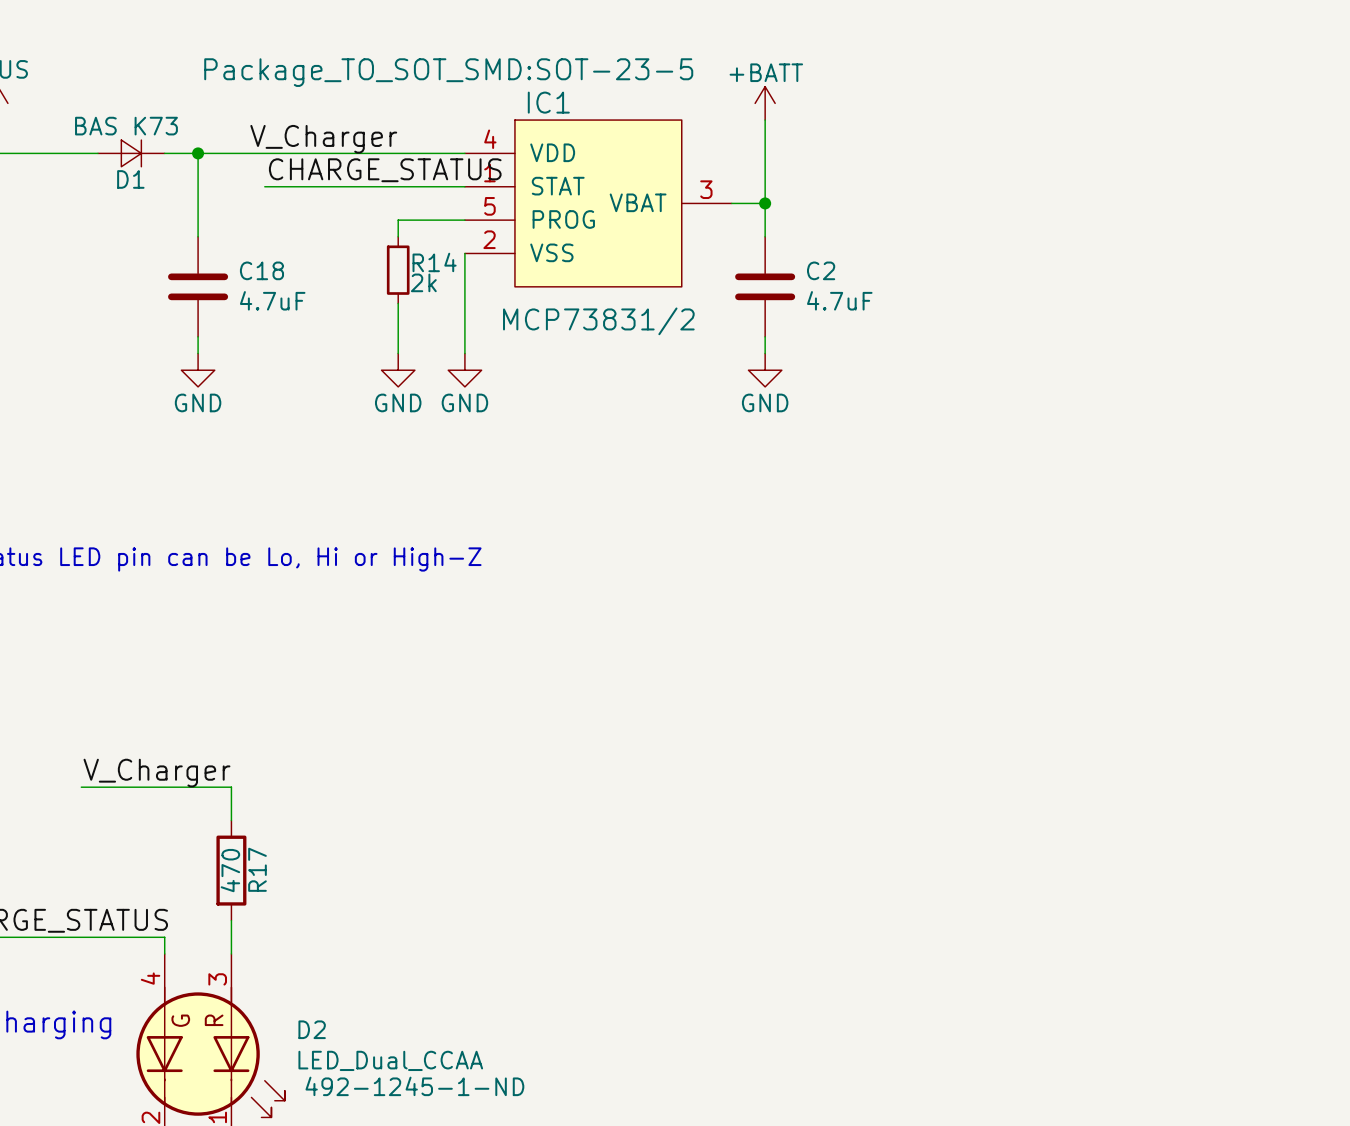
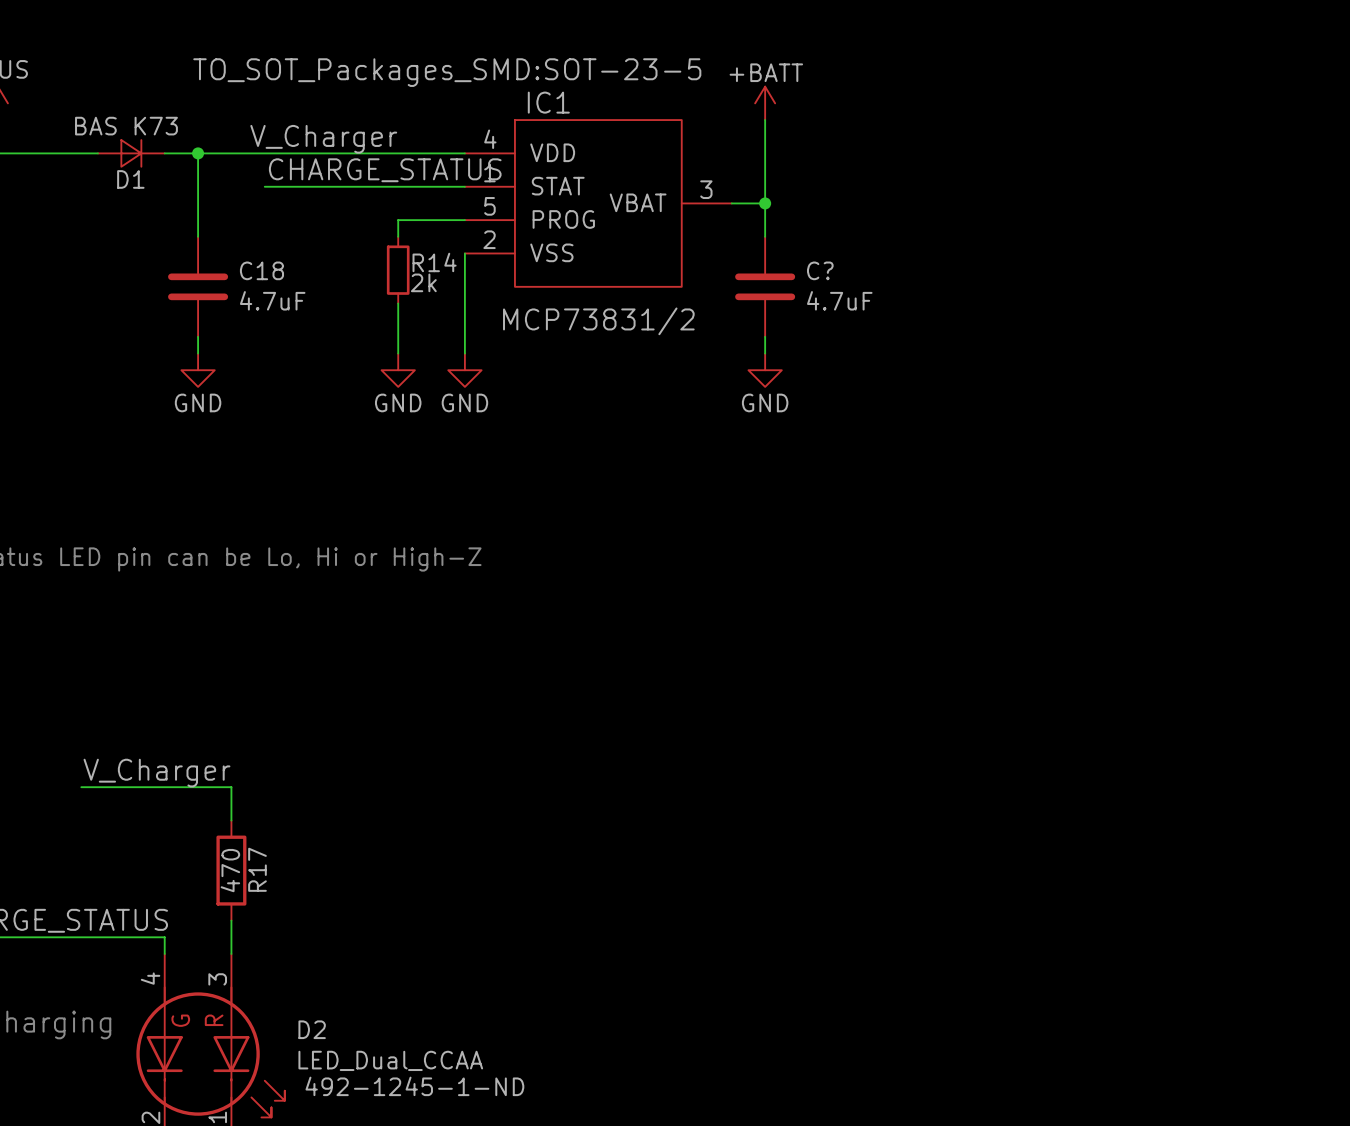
IC1 text: Package_TO_SOT_SMD:SOT-23-5 (448, 72) -> TO_SOT_Packages_SMD:SOT-23-5 (447, 72)
C2 name: C2 (821, 270) -> C? (820, 270)

